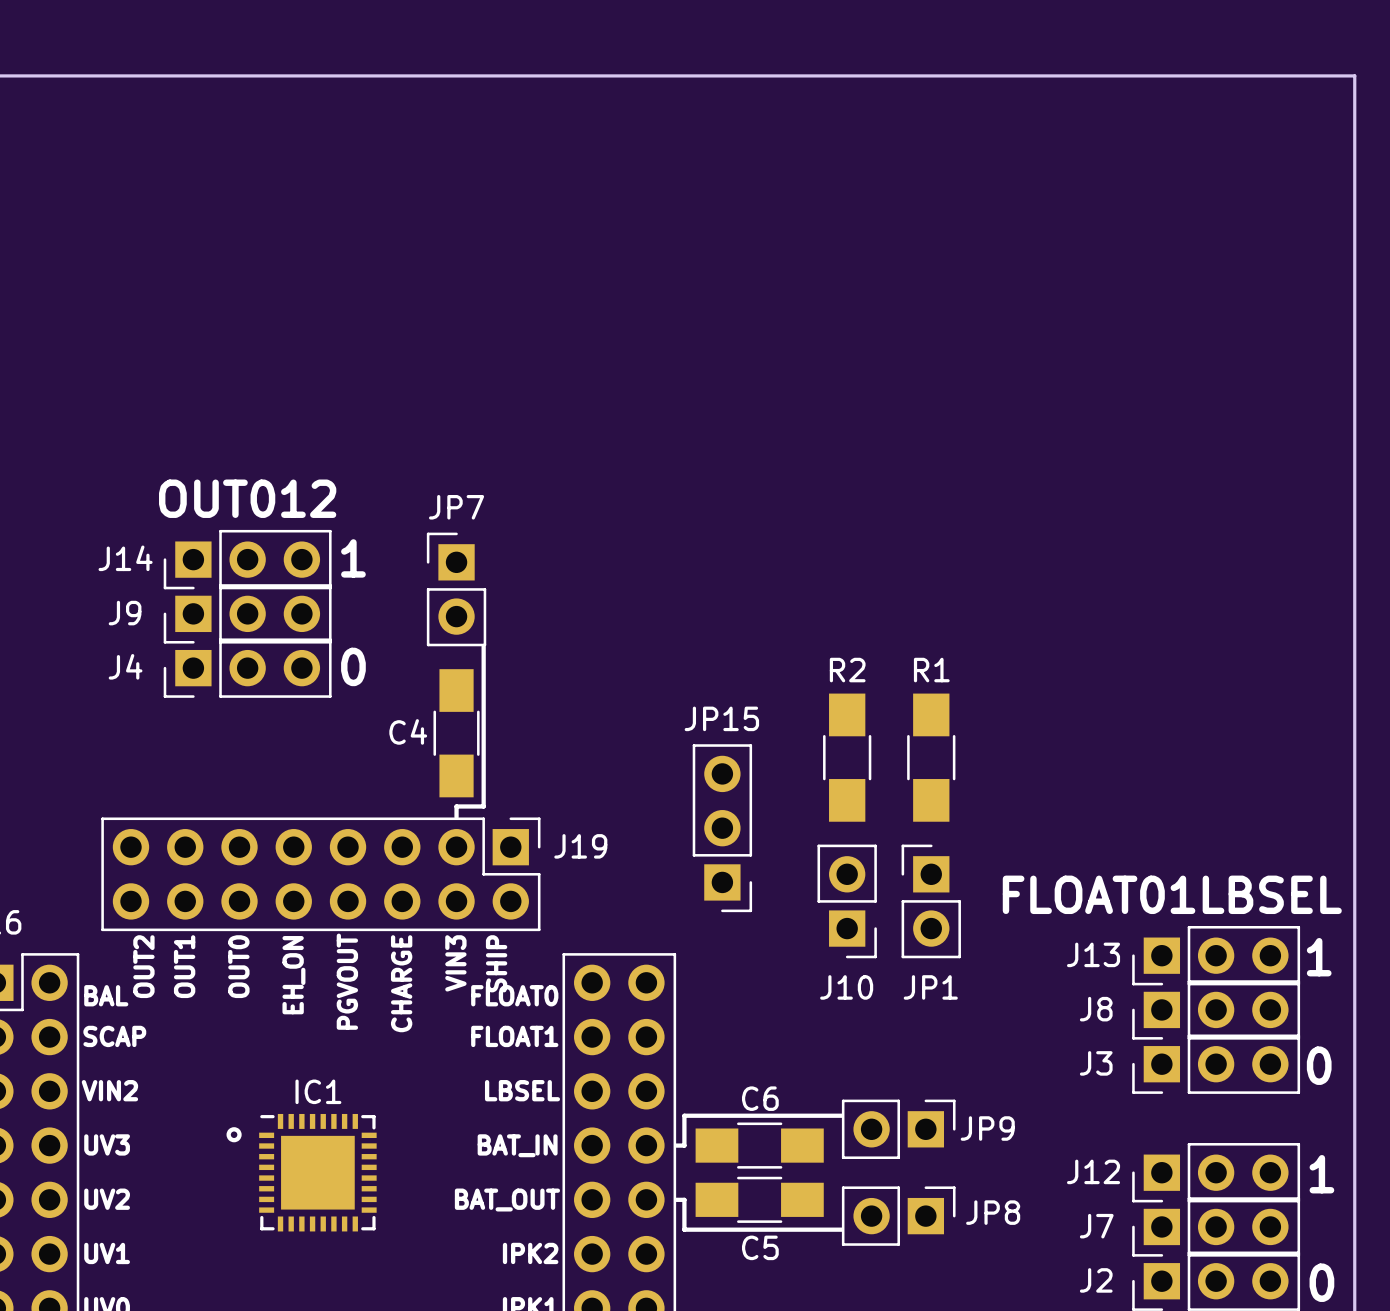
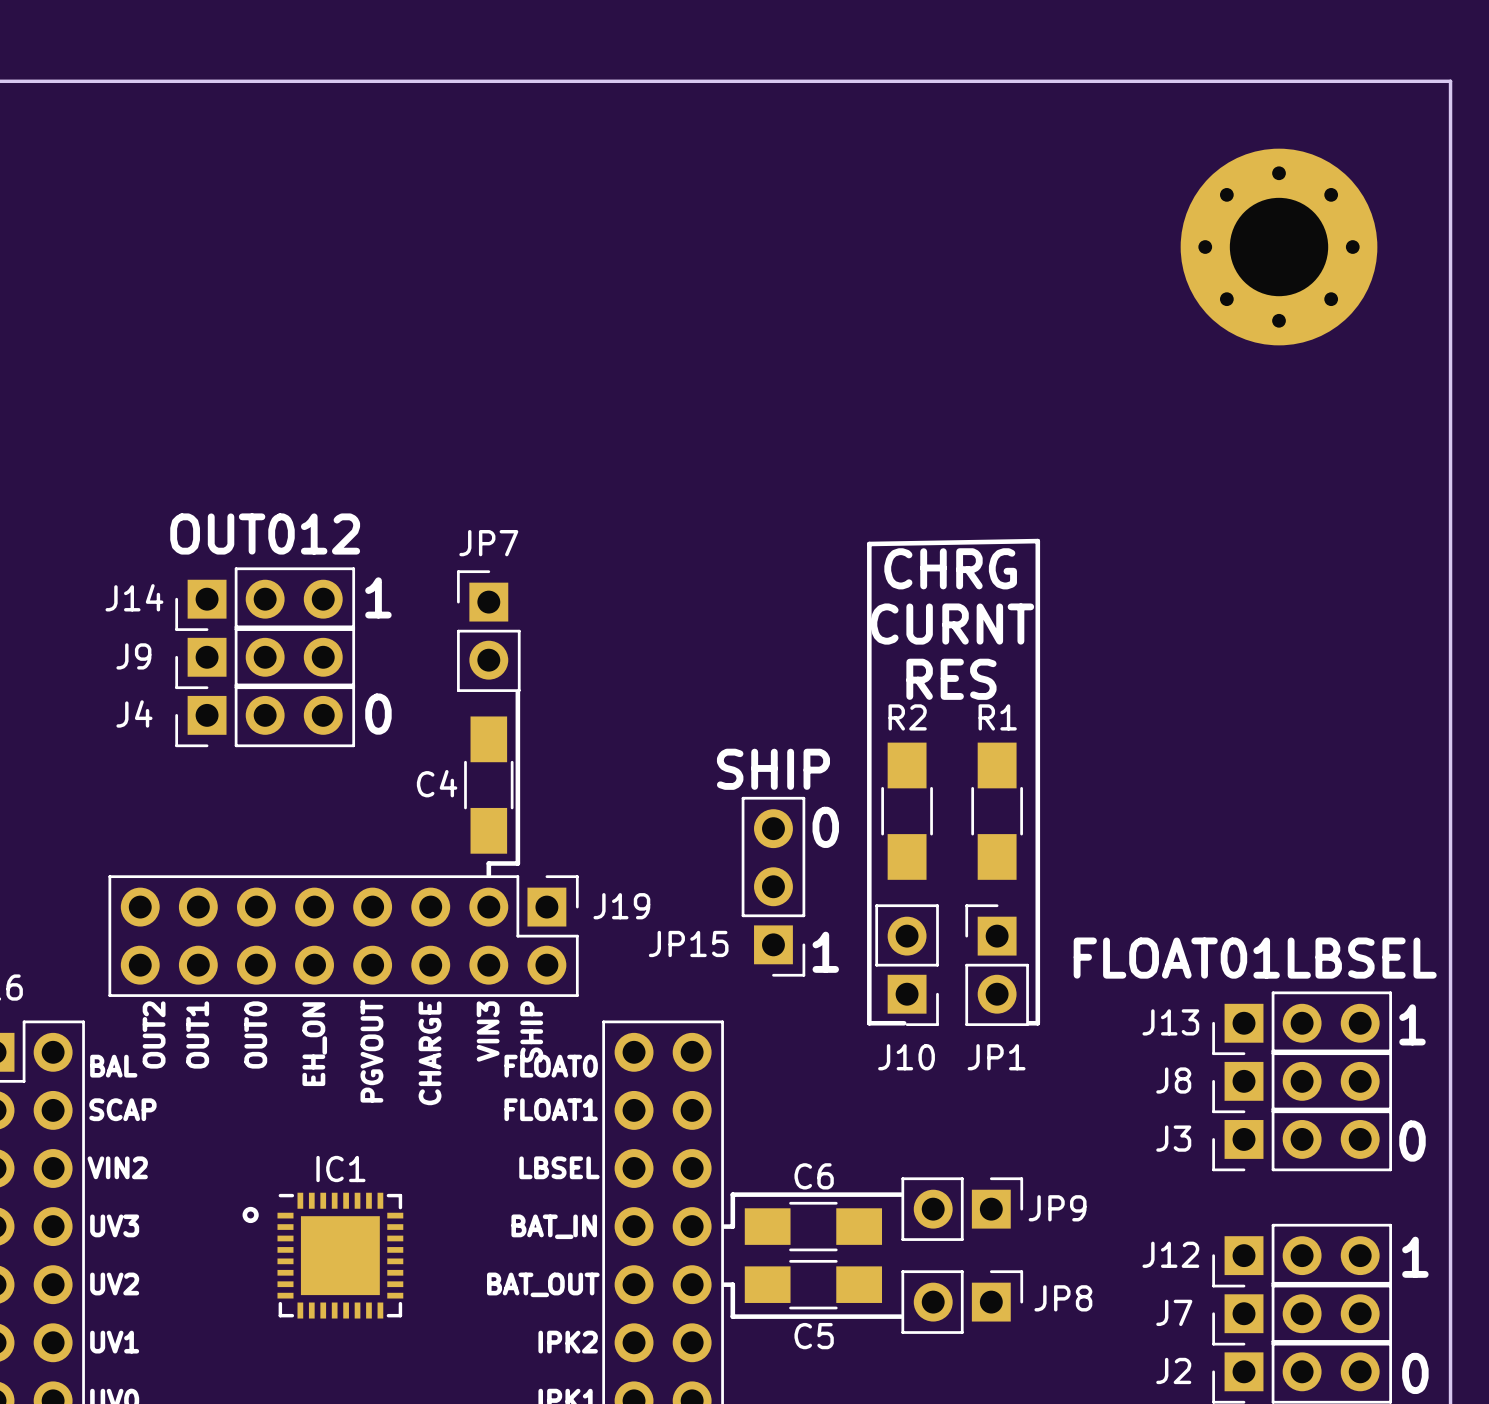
part: none -> (1279, 247)
text: none -> CHRG (950, 568)
text: none -> CURNT (952, 624)
text: none -> RES (951, 679)
JP15 name position: JP15 (721, 718) -> JP15 (688, 943)
text: none -> SHIP (773, 769)
text: none -> 0 (825, 827)
text: none -> 1 (825, 952)
line: none -> (904, 1023) (869, 1023) (869, 544) (1037, 541) (1037, 1023) (1029, 1023)

